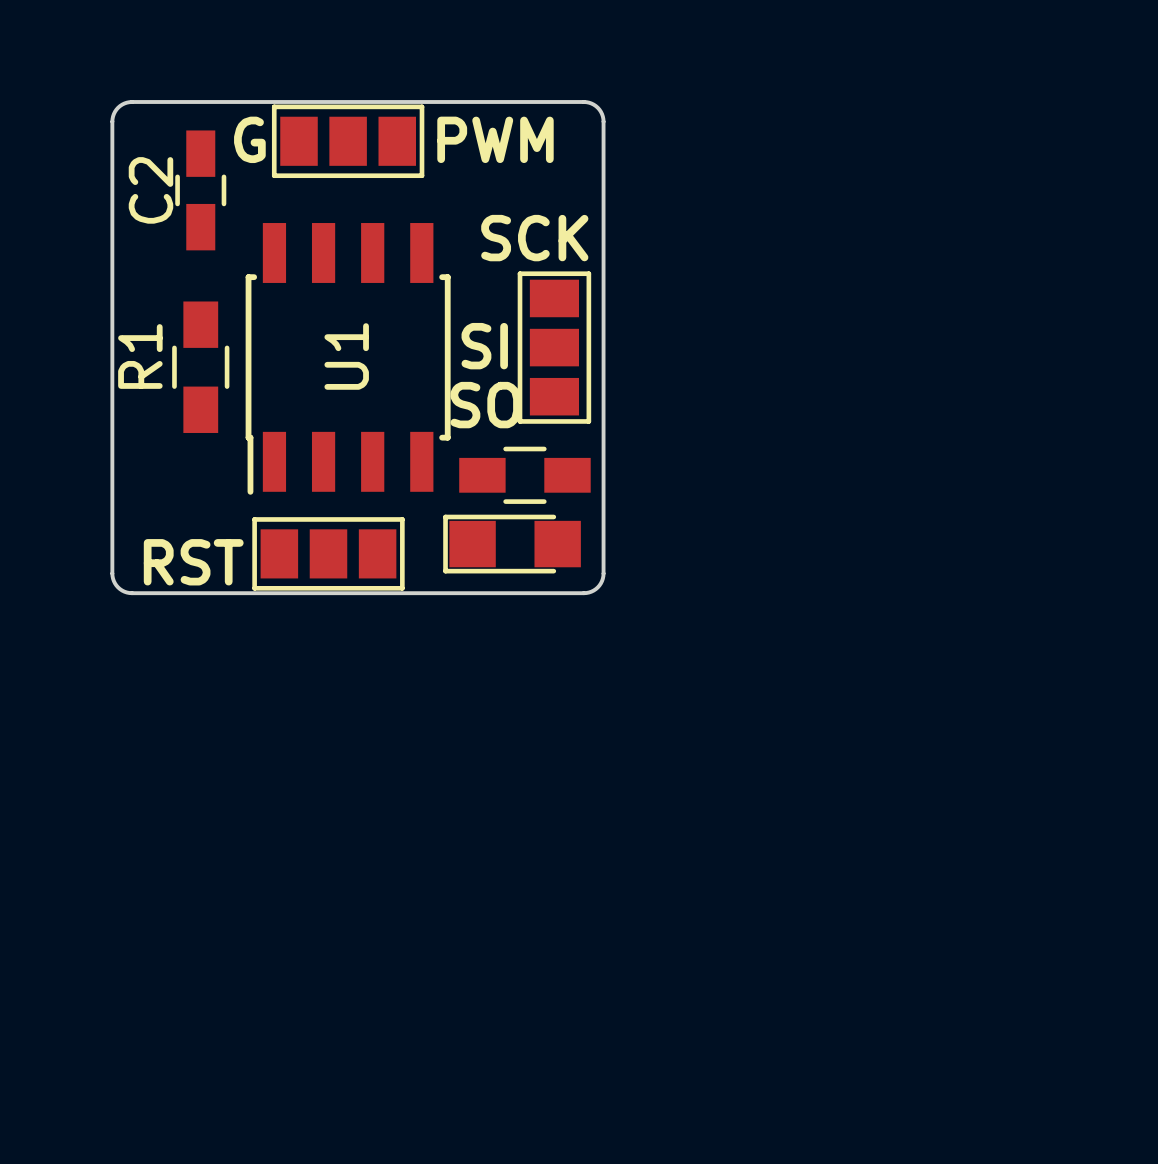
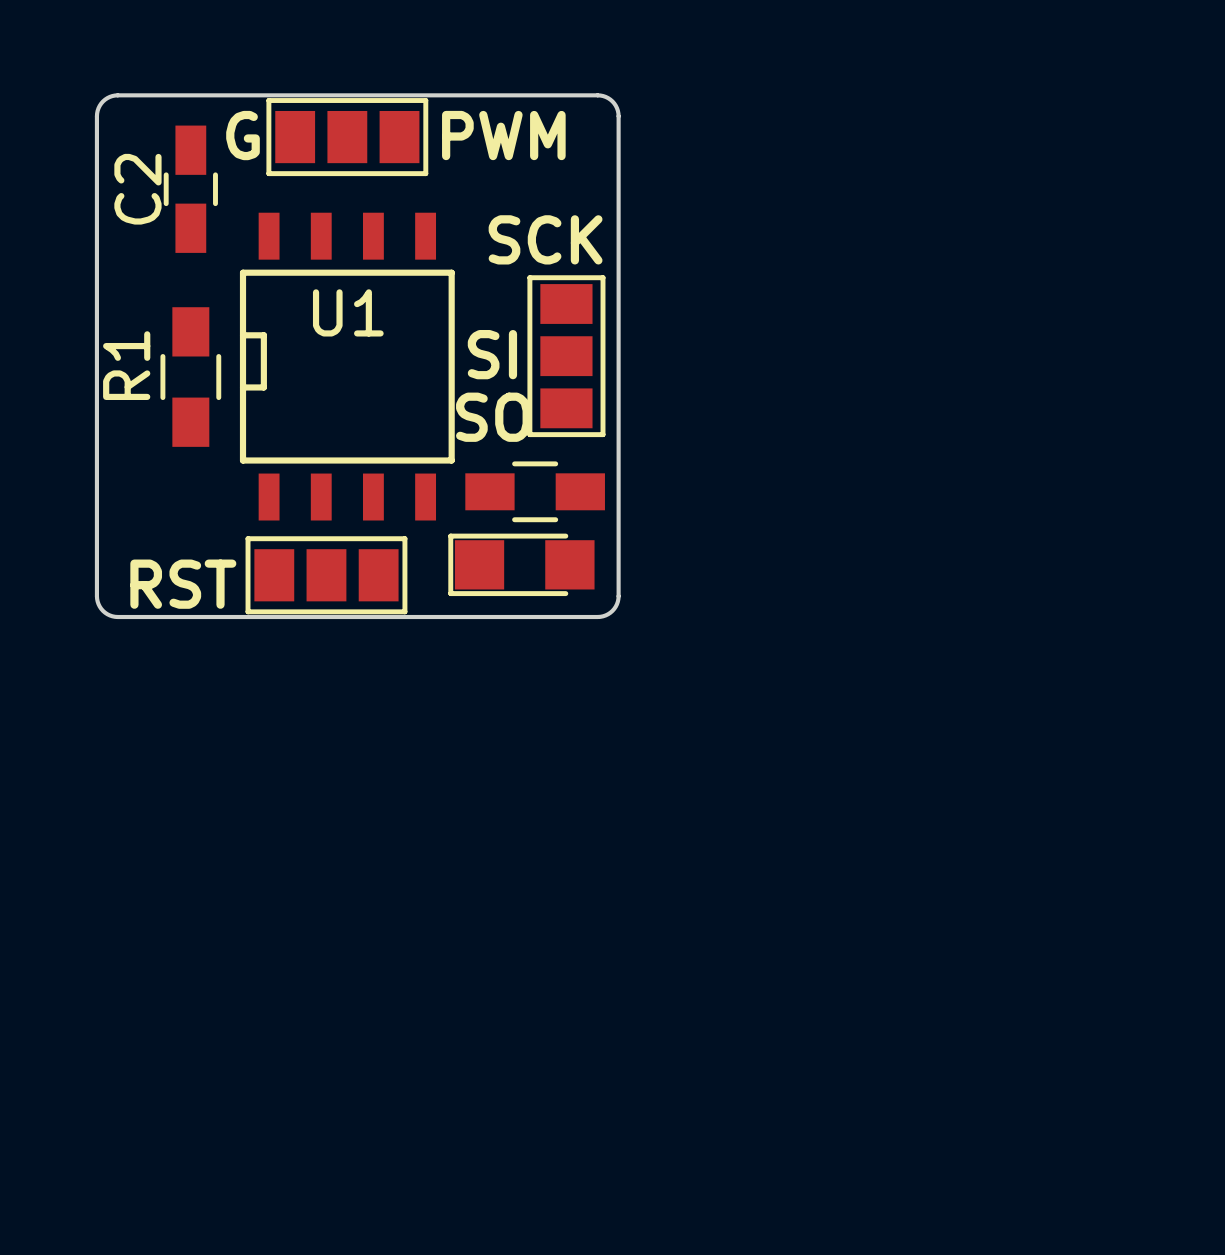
U1 footprint: [245, 223, 451, 495] -> [239, 212, 455, 521]

